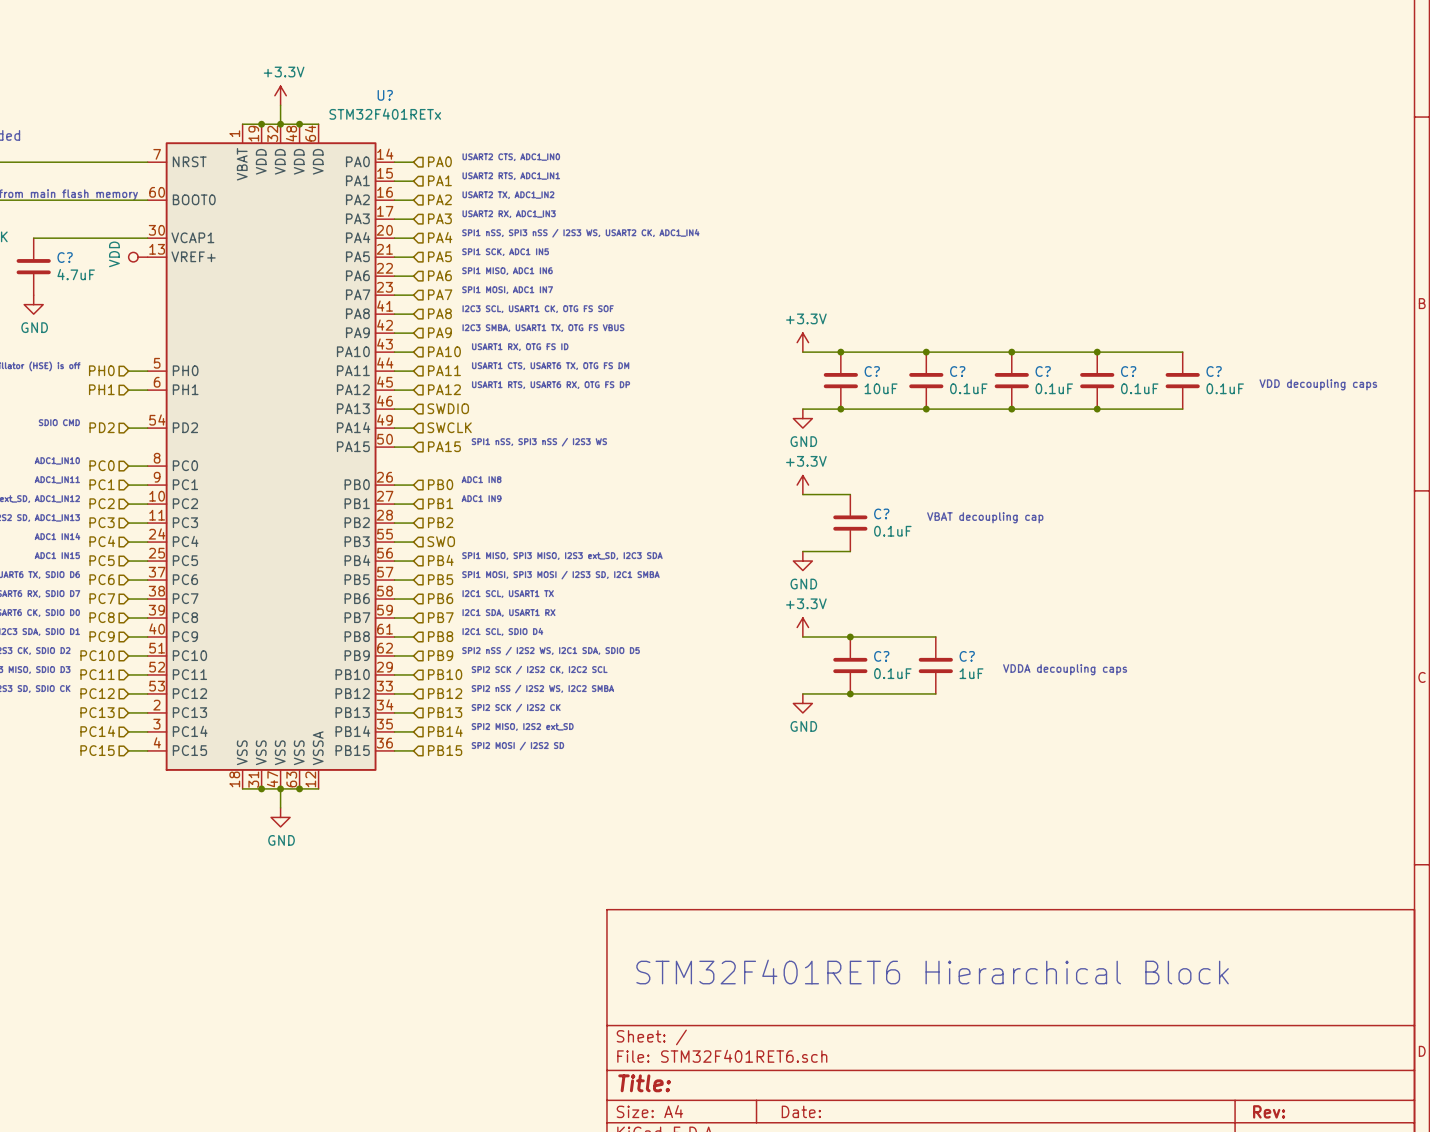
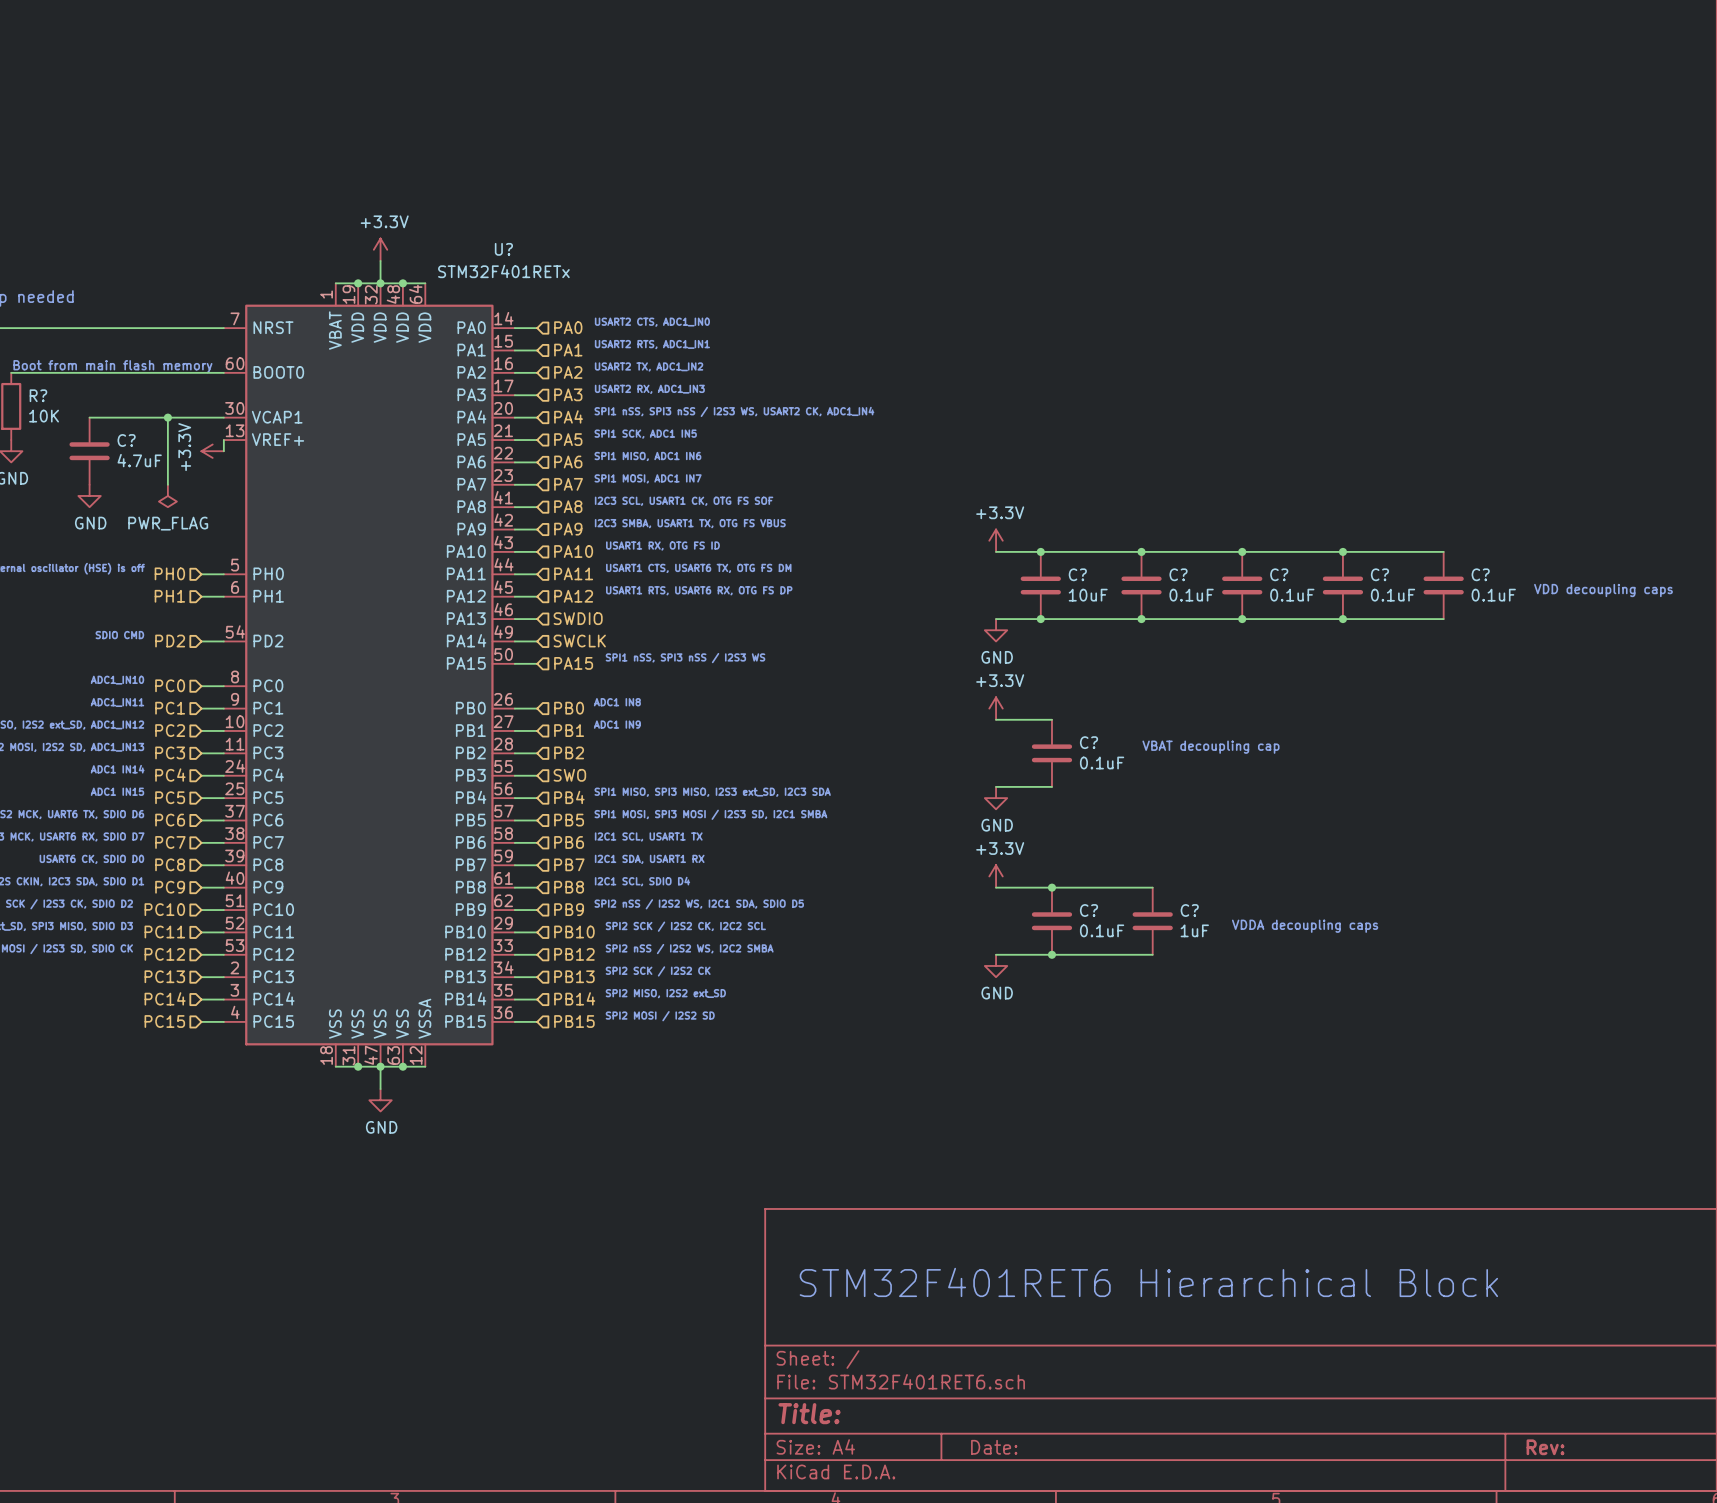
wire: none -> (167, 417) (167, 484)
junction: none -> (167, 417)
power symbol: VDD (138, 257) -> none
wire: none -> (223, 440) (223, 451)
power symbol: none -> +3.3V (212, 451)
power symbol: none -> PWR_FLAG (167, 495)

